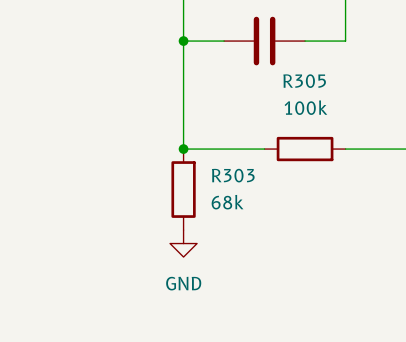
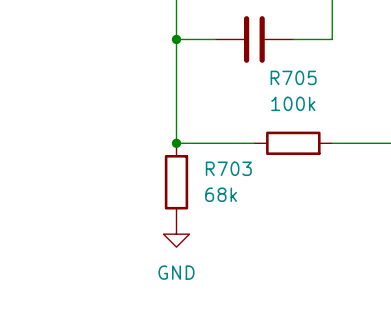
R305 name: R305 (304, 81) -> R705 (293, 77)
R303 name: R303 (233, 175) -> R703 (228, 168)

